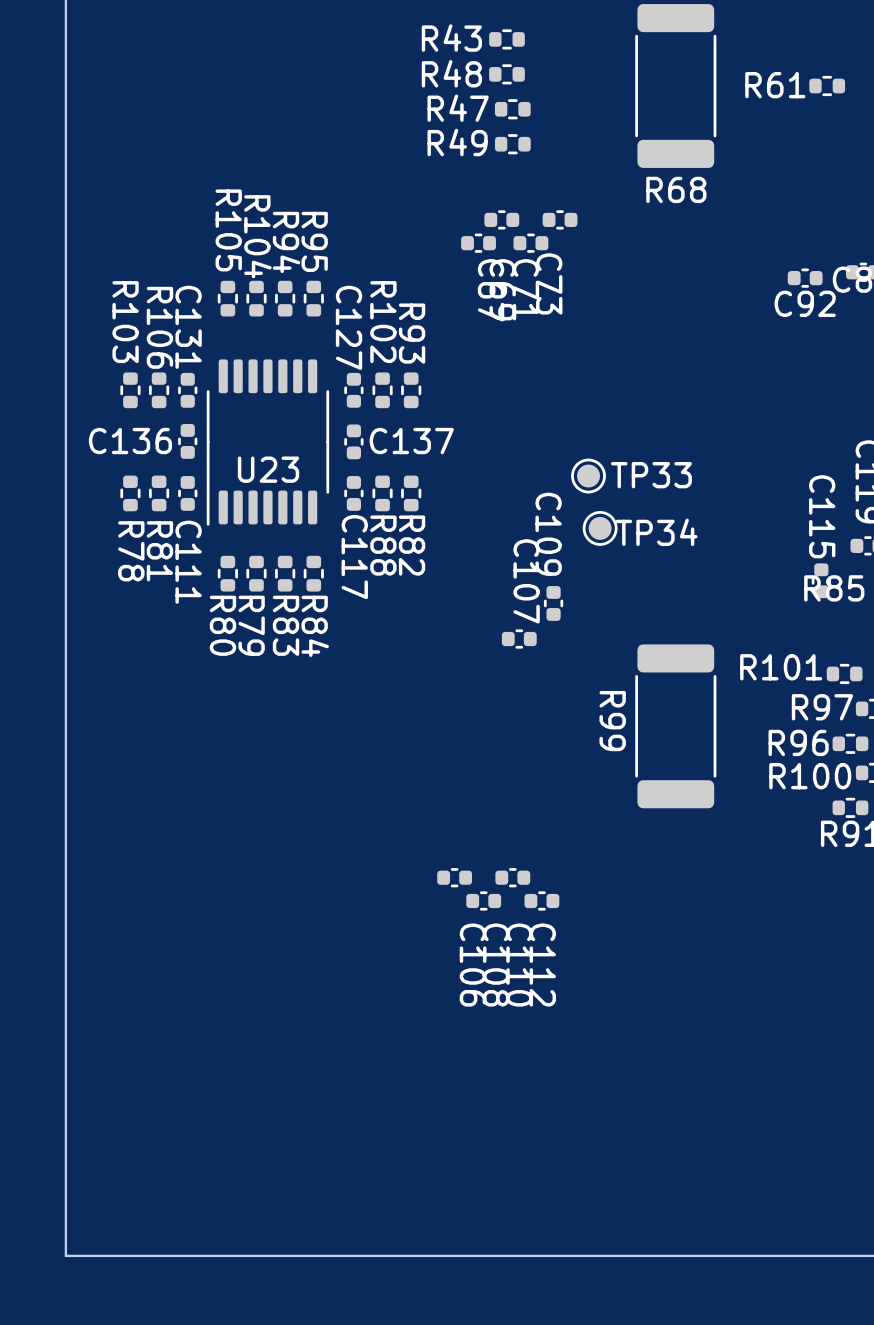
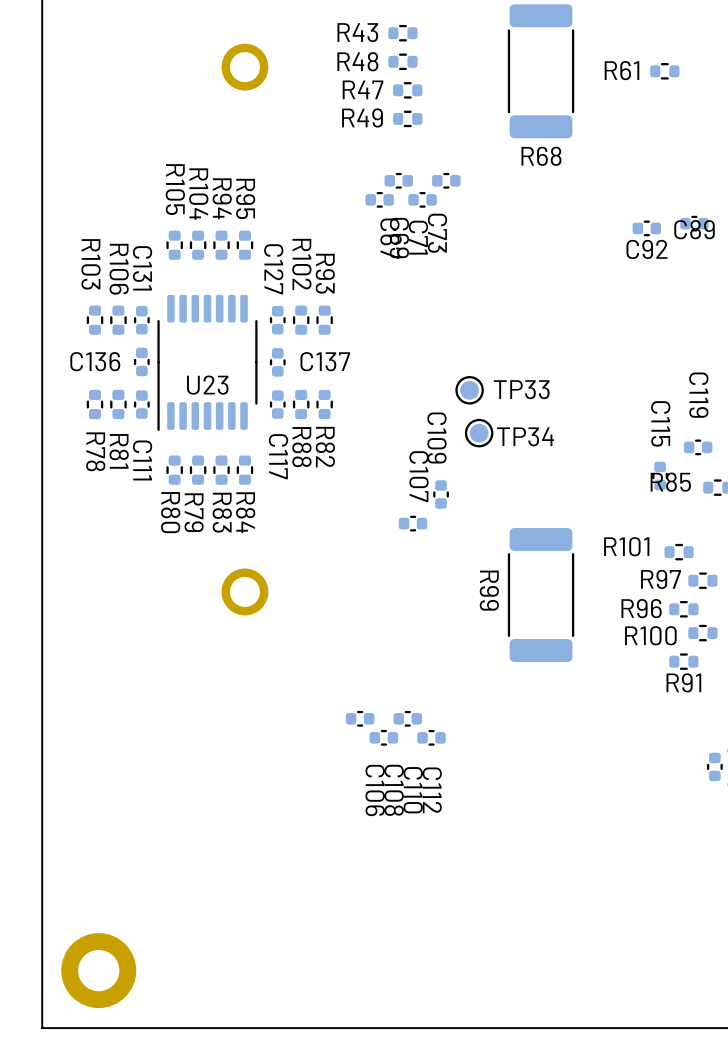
part: none -> (244, 67)
part: none -> (244, 591)
part: none -> (98, 970)

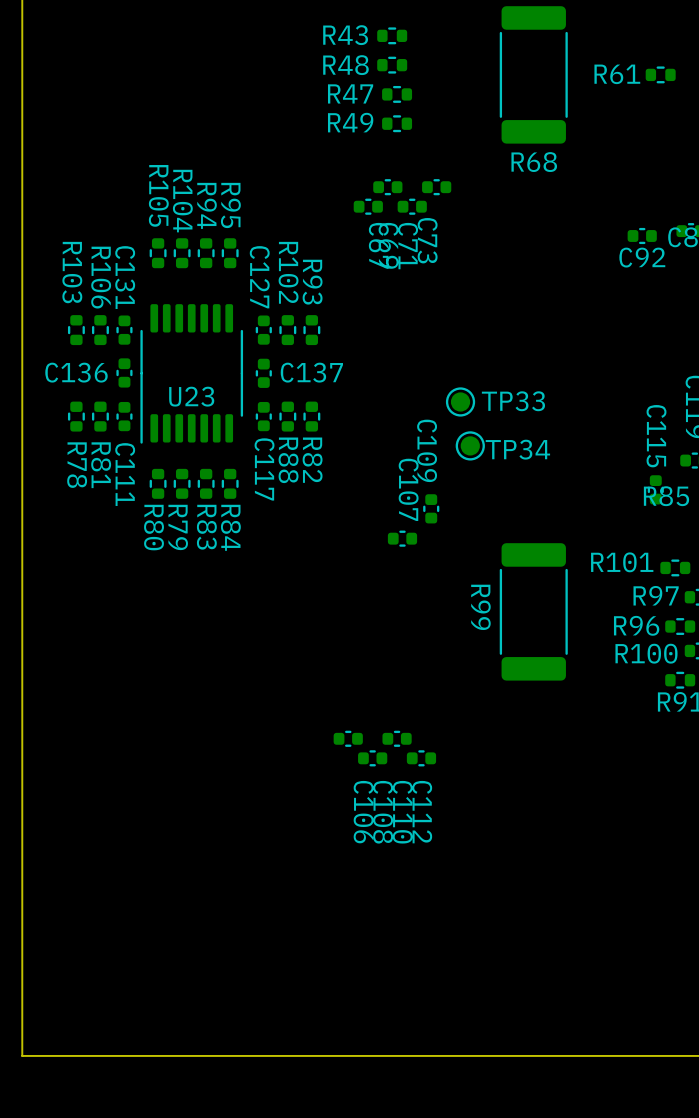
part: (244, 67) -> none
part: (244, 591) -> none
part: (98, 970) -> none

